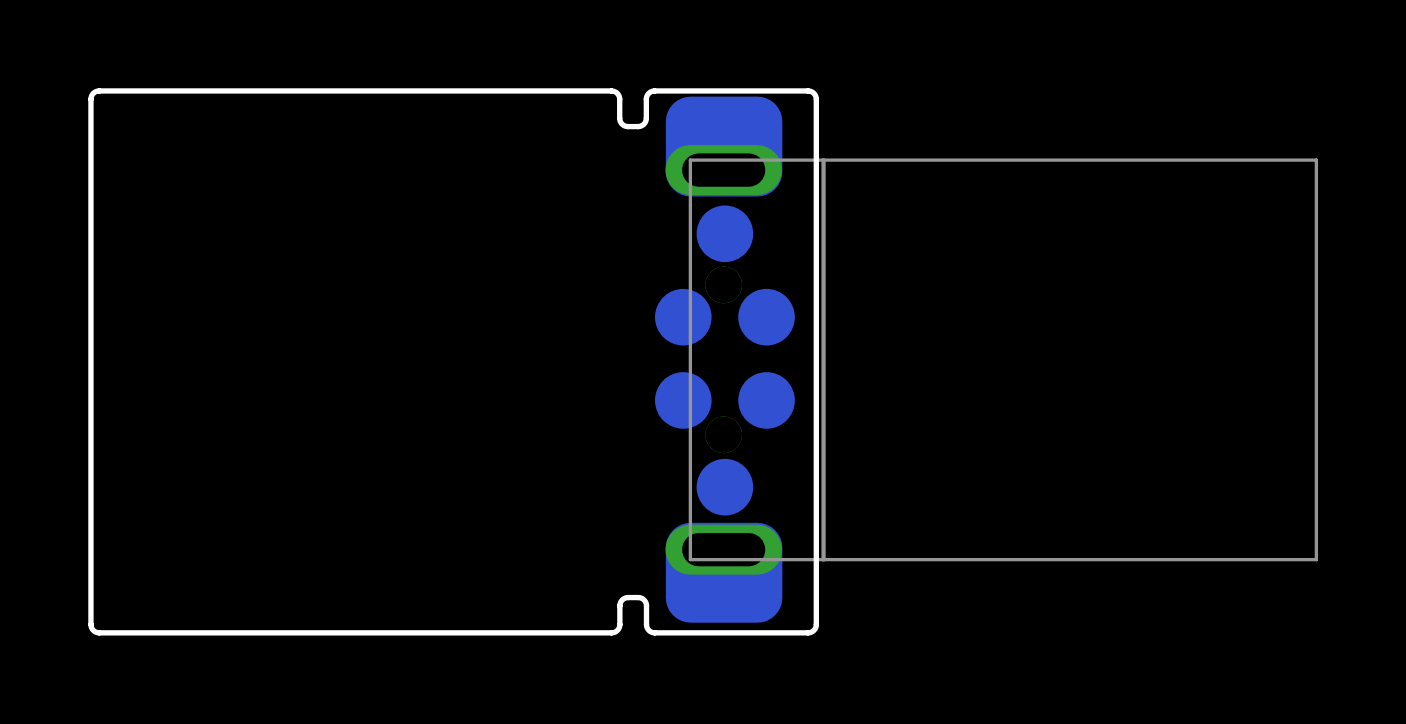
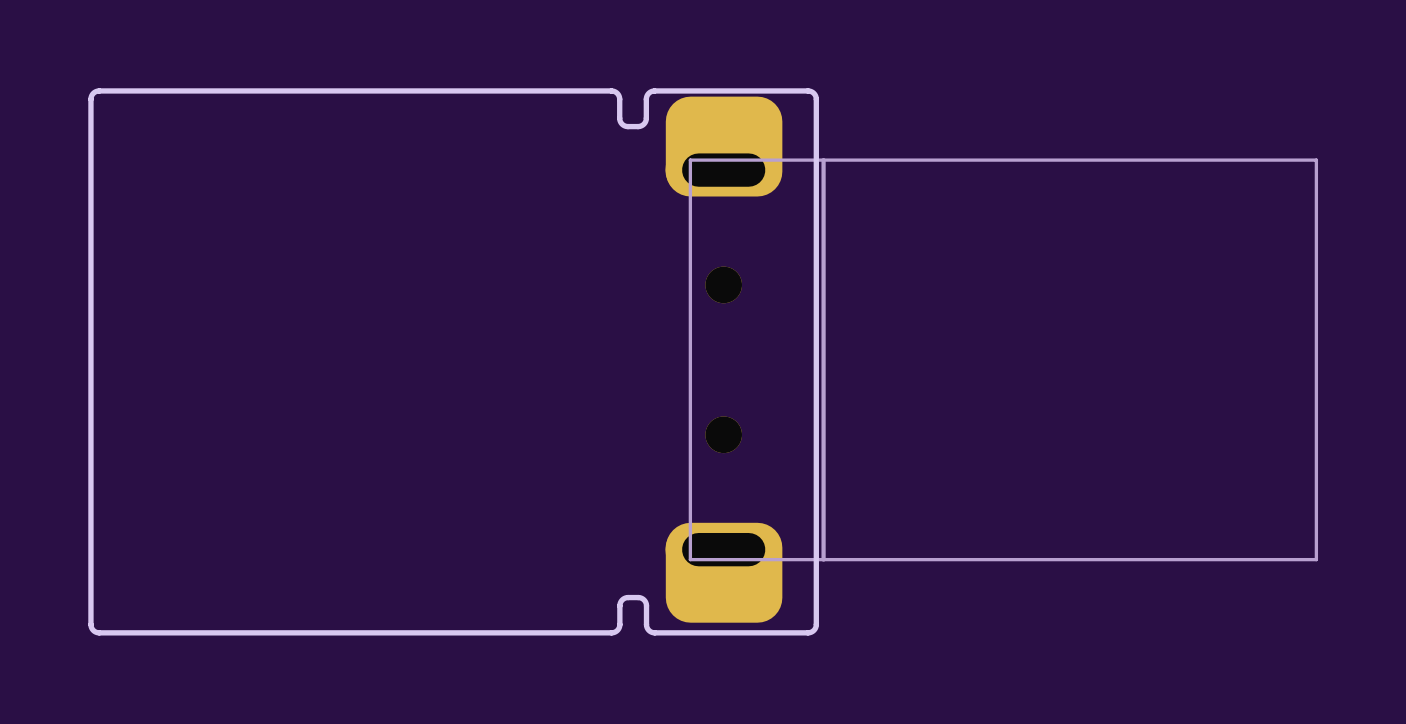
part: (724, 360) -> none

